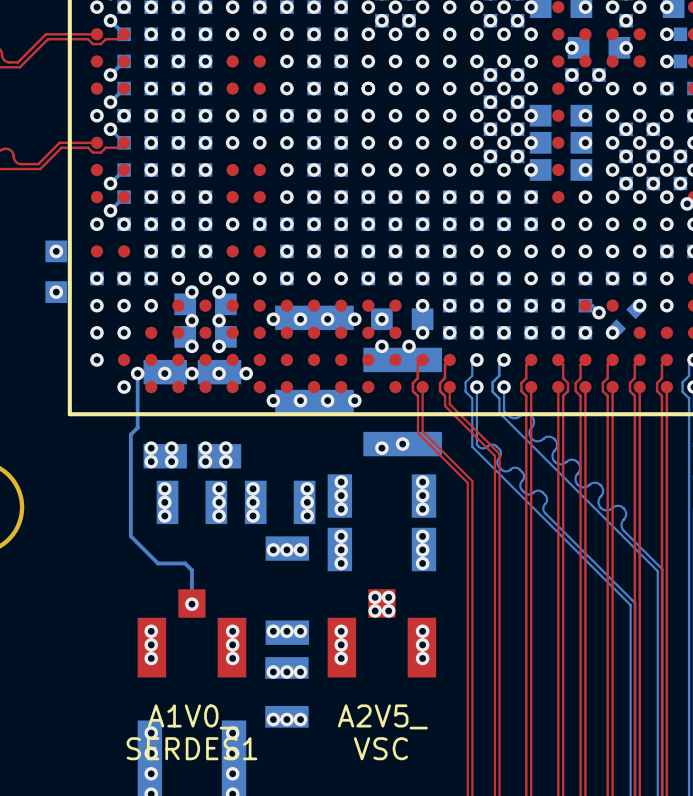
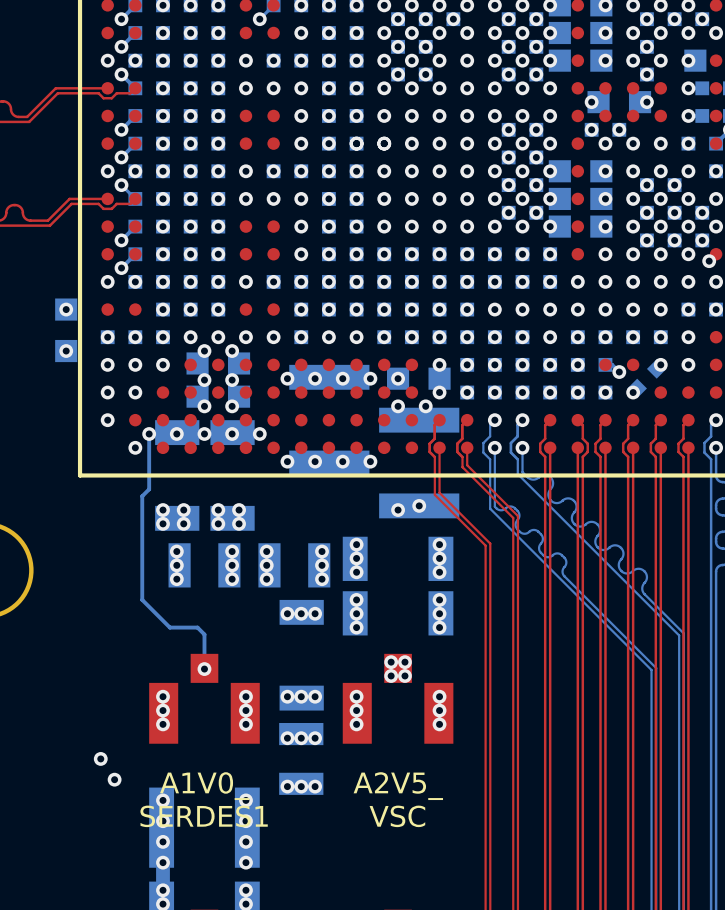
via: none -> (100, 758)
via: none -> (114, 779)

